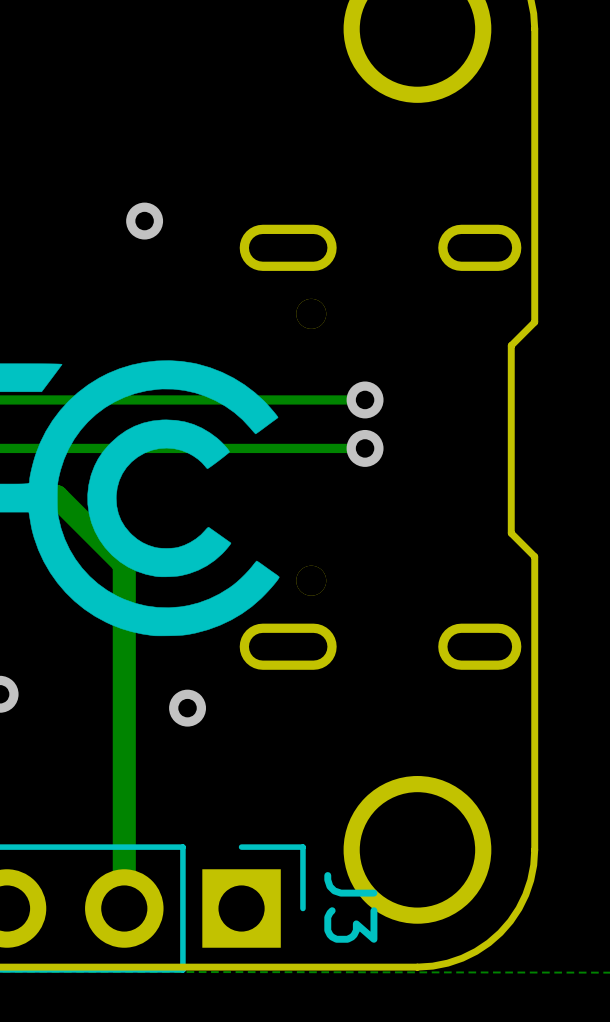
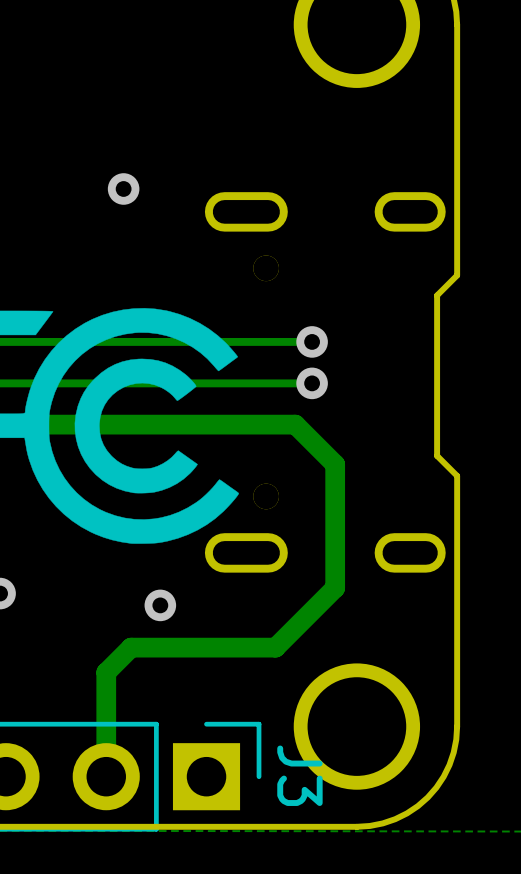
track: (56, 496) (124, 564) (124, 786) -> (48, 424) (295, 424) (335, 464) (335, 588) (275, 647) (131, 647) (106, 672)

